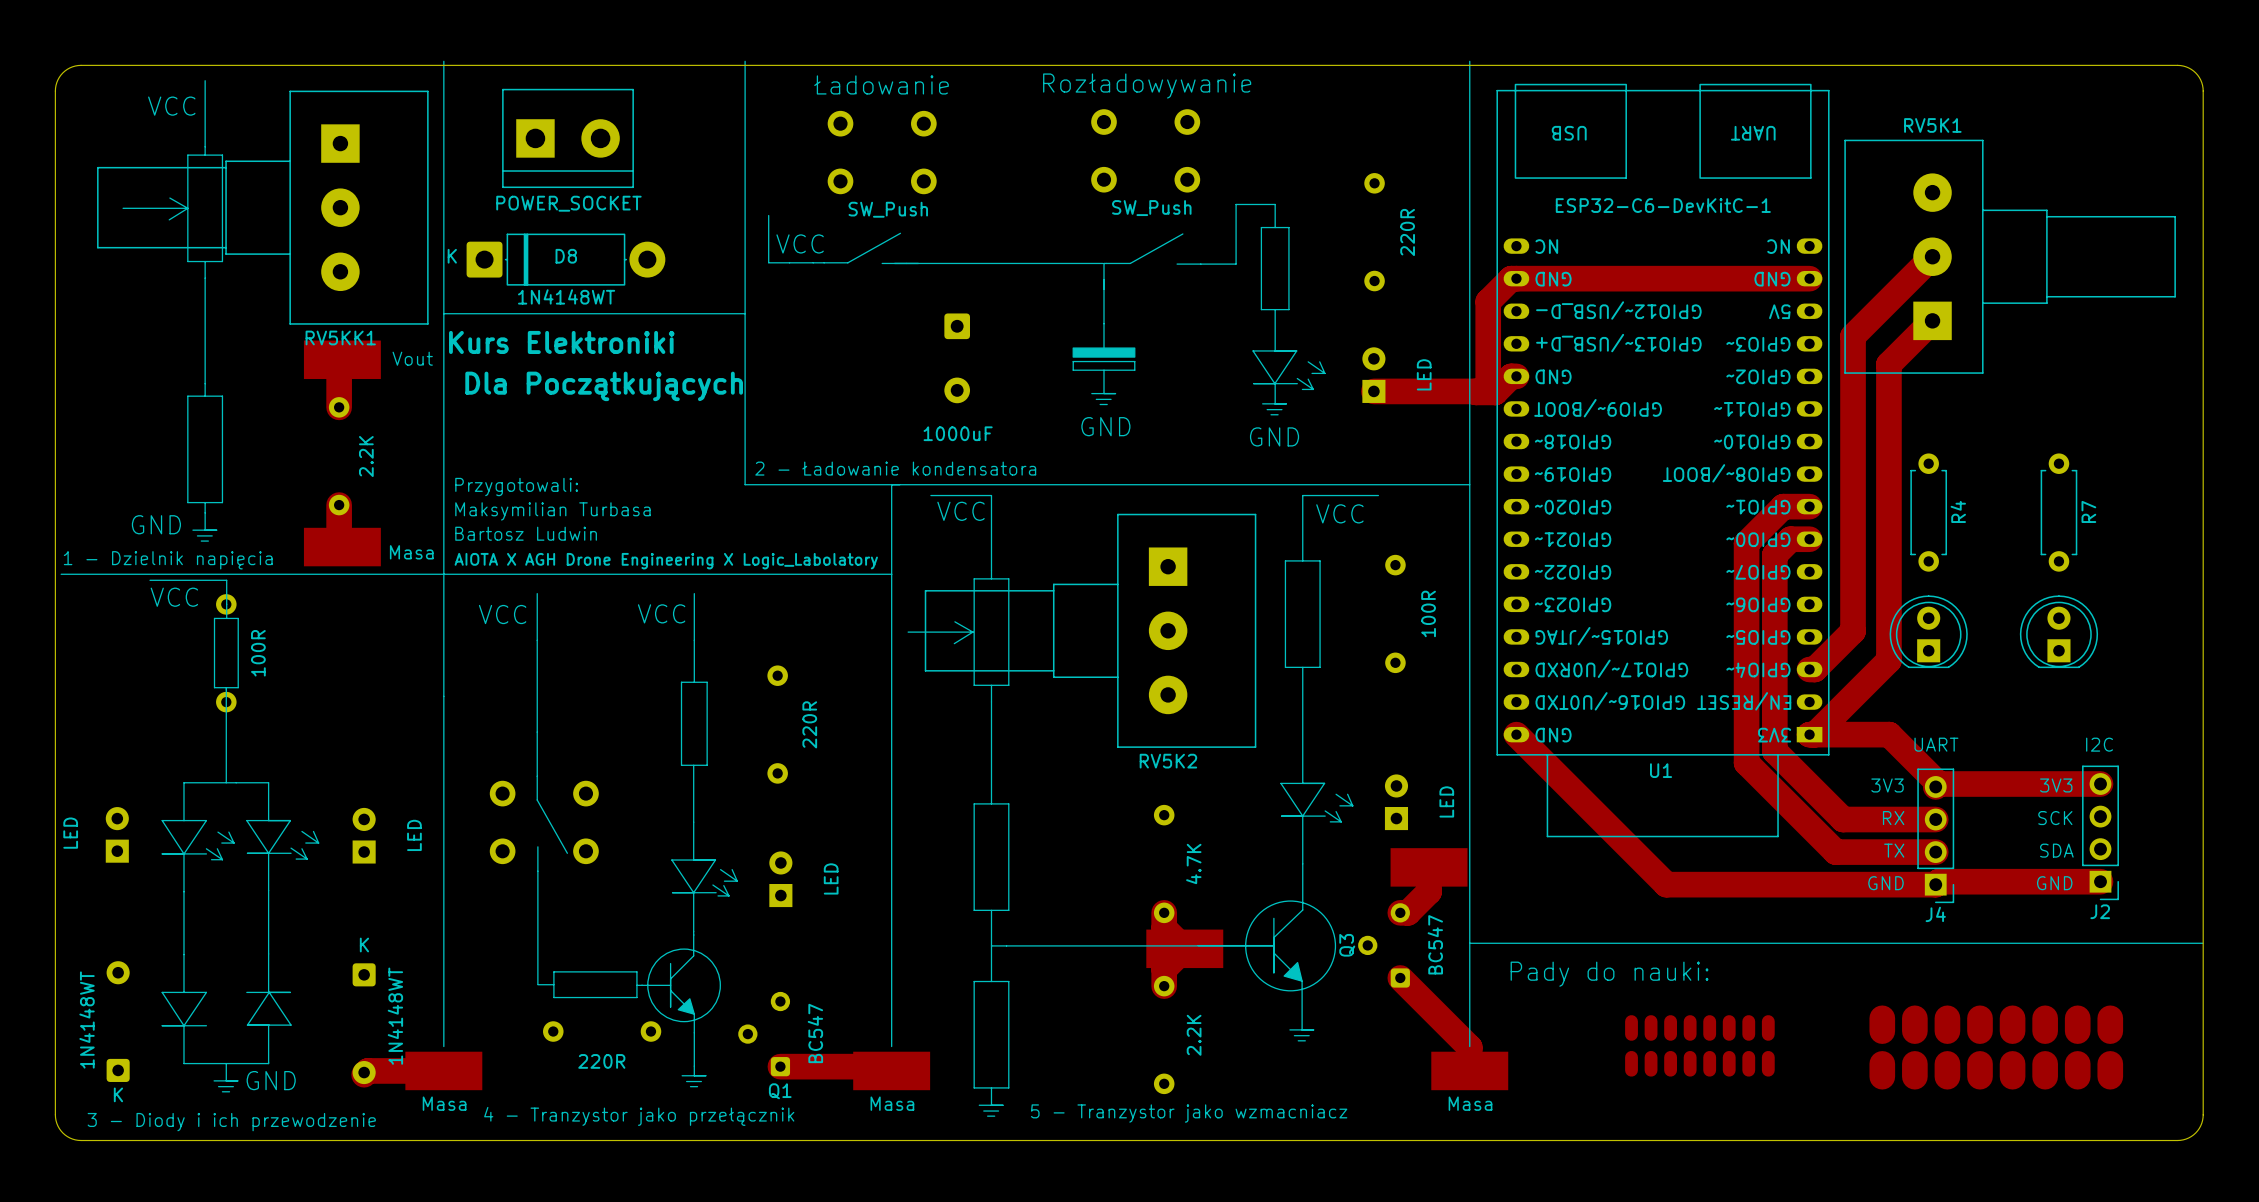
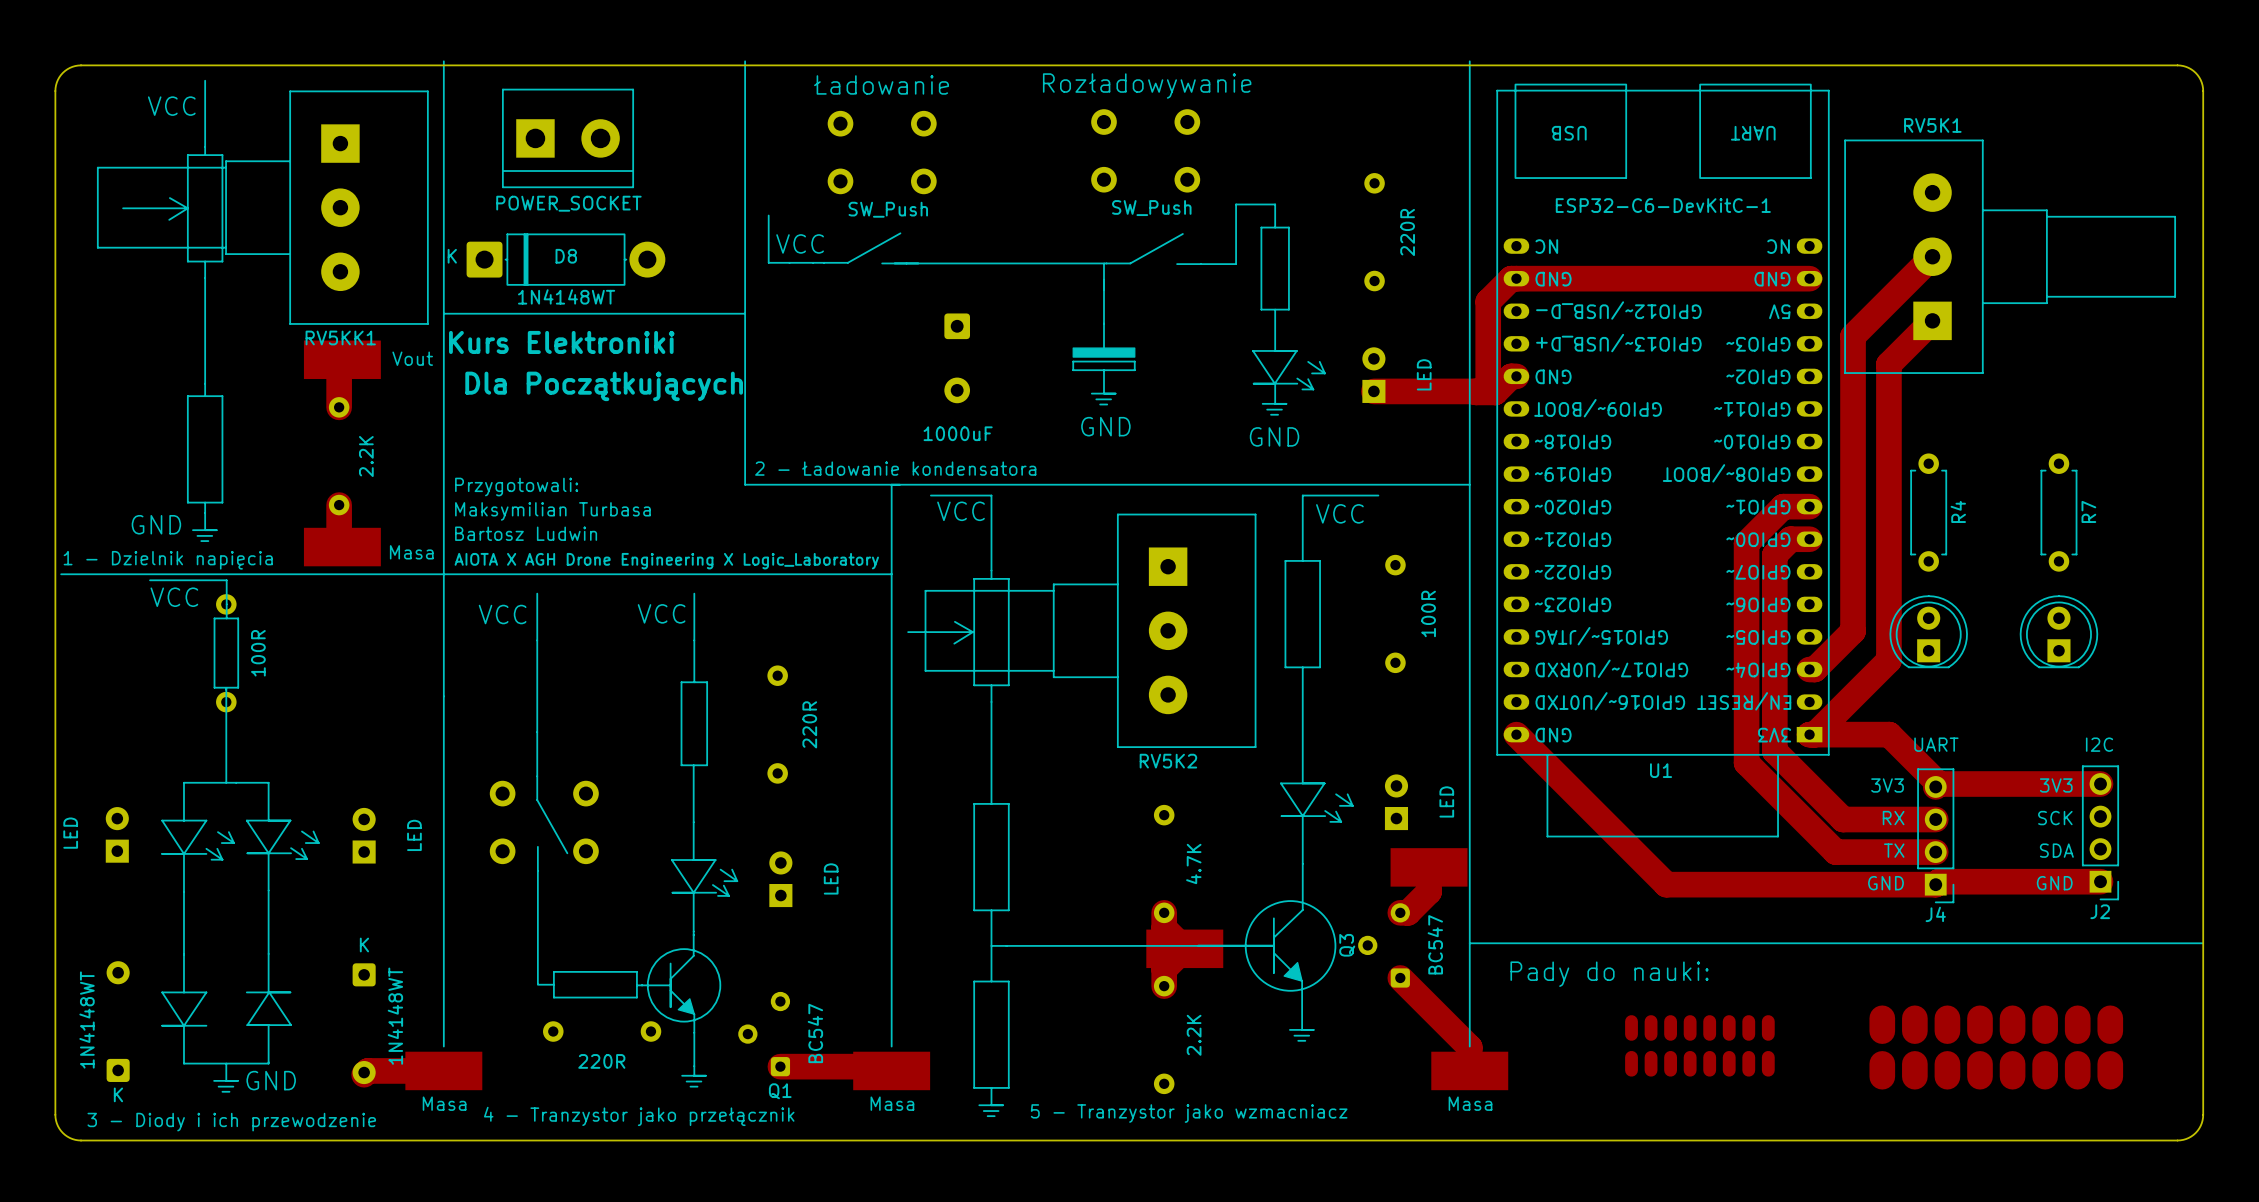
text: AIOTA X AGH Drone Engineering X Logic_Labolatory (666, 561) -> AIOTA X AGH Drone Engineering X Logic_Laboratory (666, 561)

